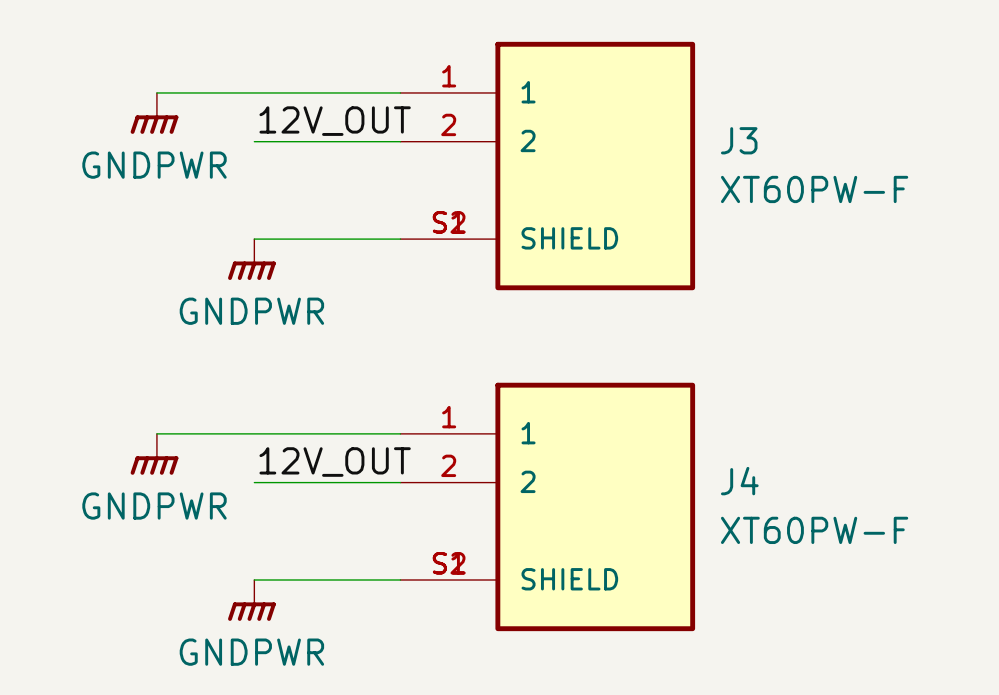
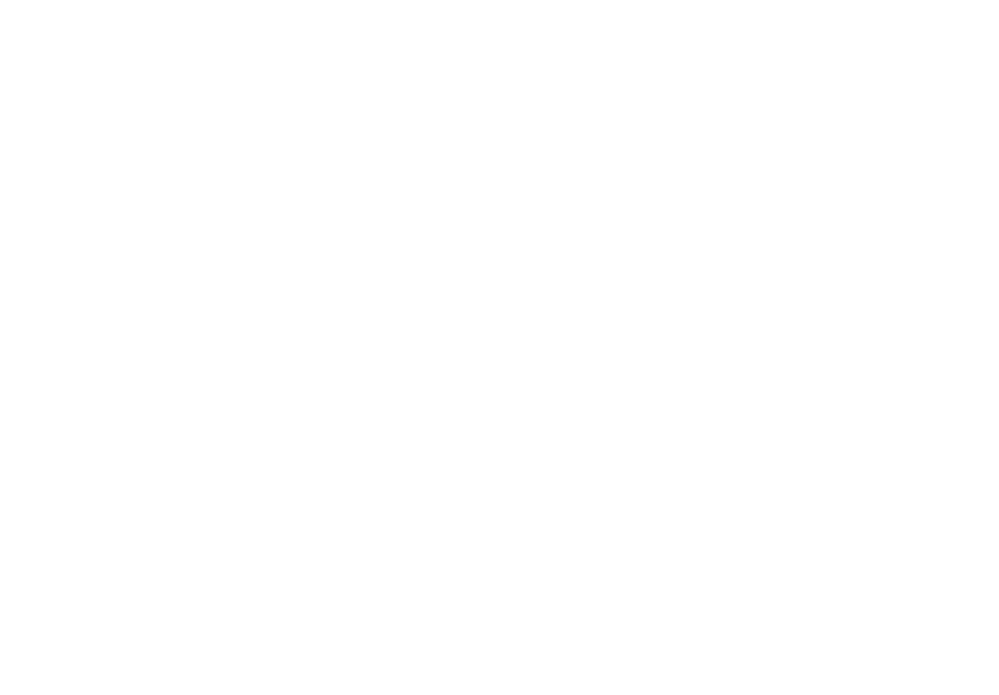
wire: (156, 92) (400, 92) -> none
power symbol: GNDPWR (154, 113) -> none
label: 12V_OUT (335, 121) -> none
wire: (254, 141) (400, 141) -> none
J3: XT60PW-F (547, 166) -> none
wire: (254, 239) (400, 239) -> none
power symbol: GNDPWR (251, 259) -> none
wire: (156, 433) (400, 433) -> none
power symbol: GNDPWR (154, 454) -> none
label: 12V_OUT (335, 462) -> none
wire: (254, 482) (400, 482) -> none
J4: XT60PW-F (547, 506) -> none
wire: (254, 579) (400, 579) -> none
power symbol: GNDPWR (251, 600) -> none

